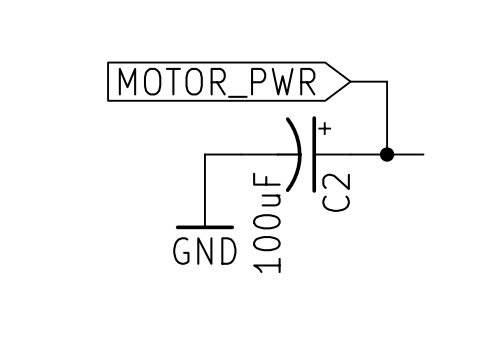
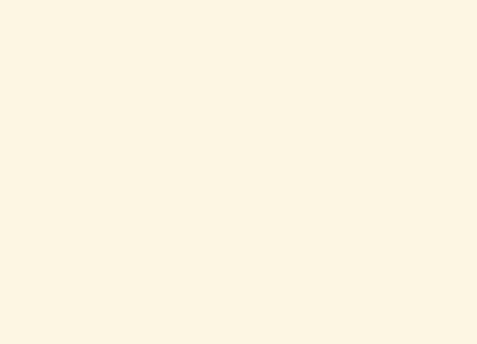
wire: (350, 81) (387, 81) (387, 154) -> none
global label: MOTOR_PWR (217, 82) -> none
wire: (241, 154) (204, 154) (204, 190) -> none
C2: 100uF (296, 154) -> none
wire: (350, 154) (423, 154) -> none
junction: (387, 154) -> none
power symbol: GND (204, 210) -> none

